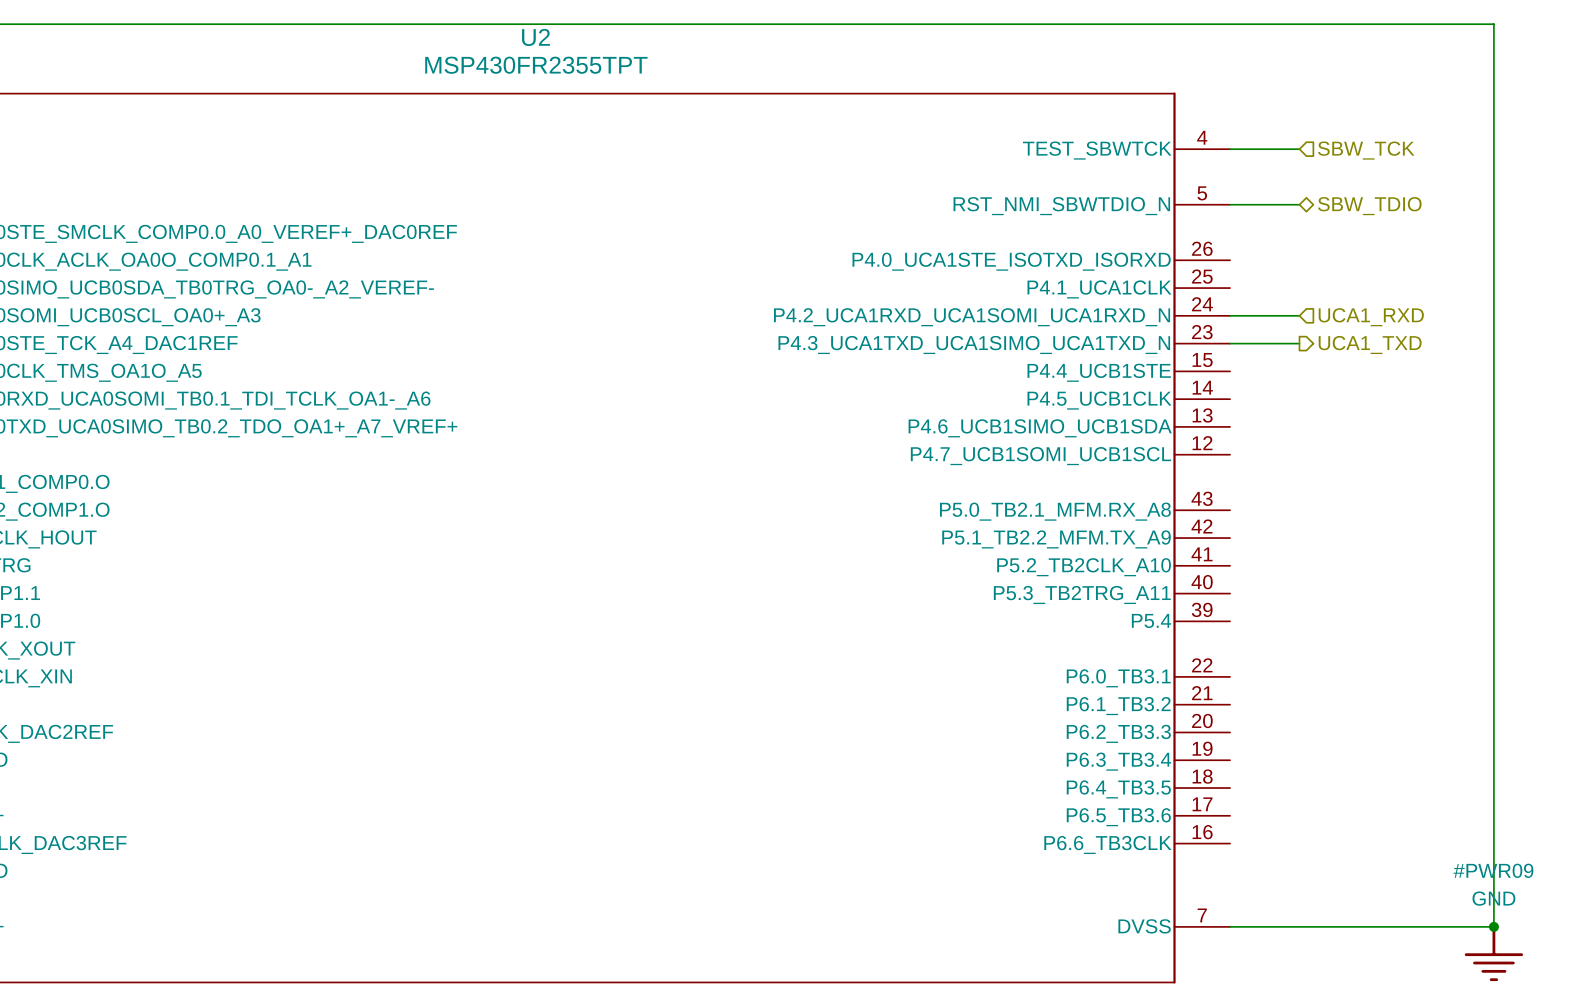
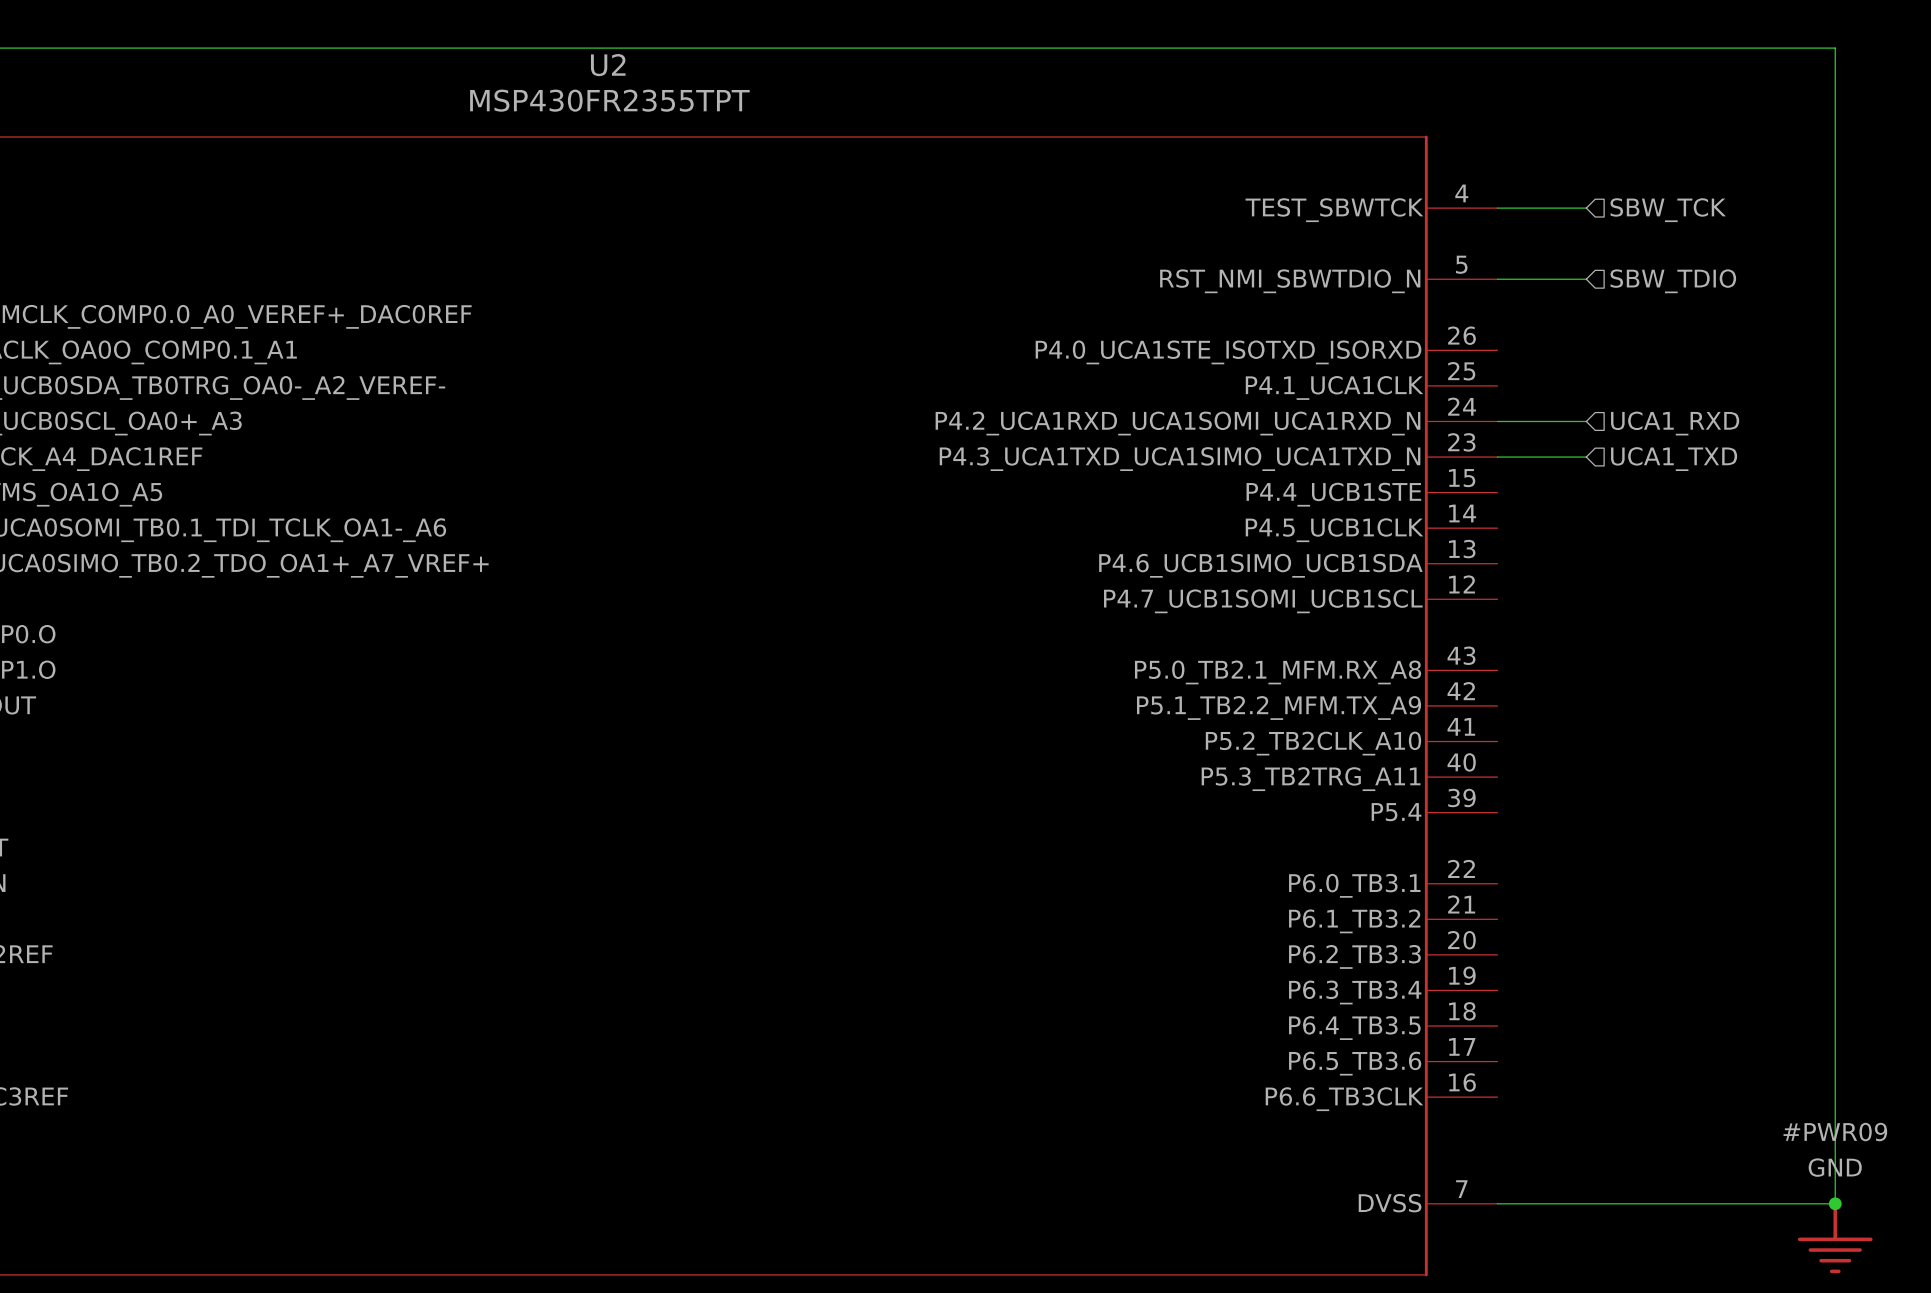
hierarchical label shape: bidirectional (1369, 206) -> input (1673, 281)
hierarchical label shape: output (1370, 344) -> input (1674, 459)

